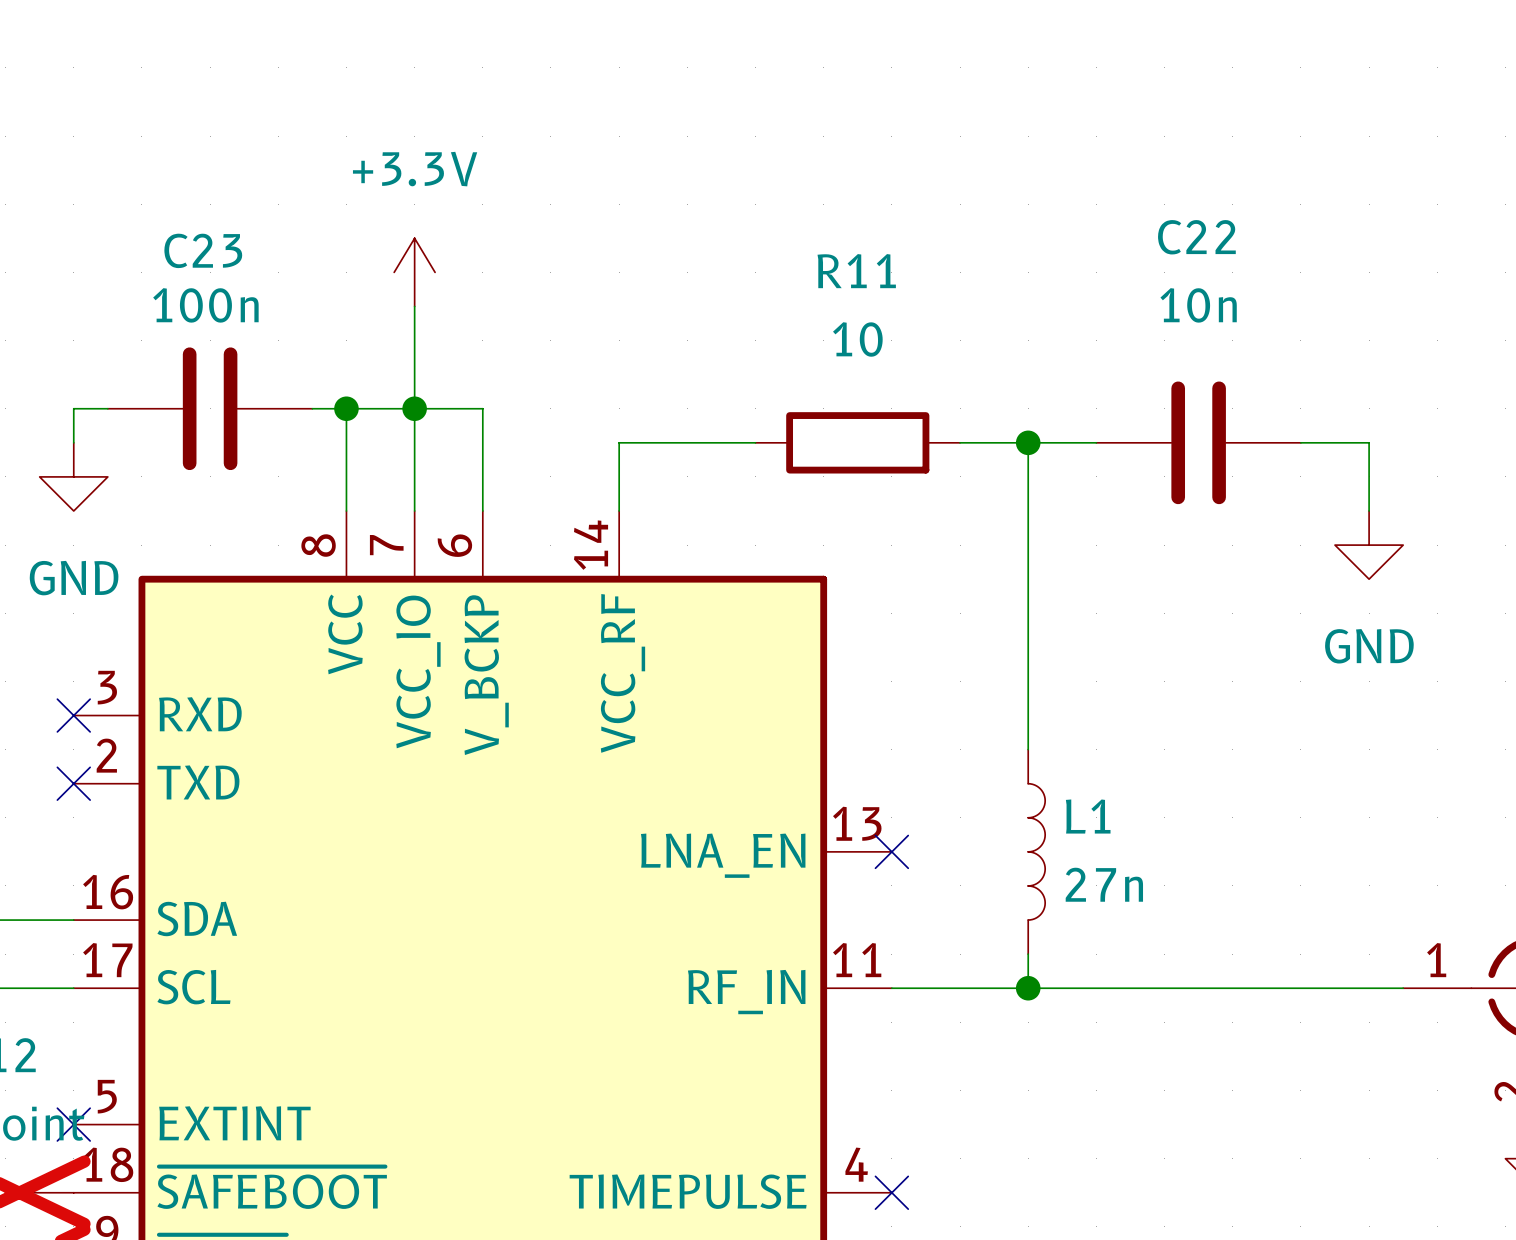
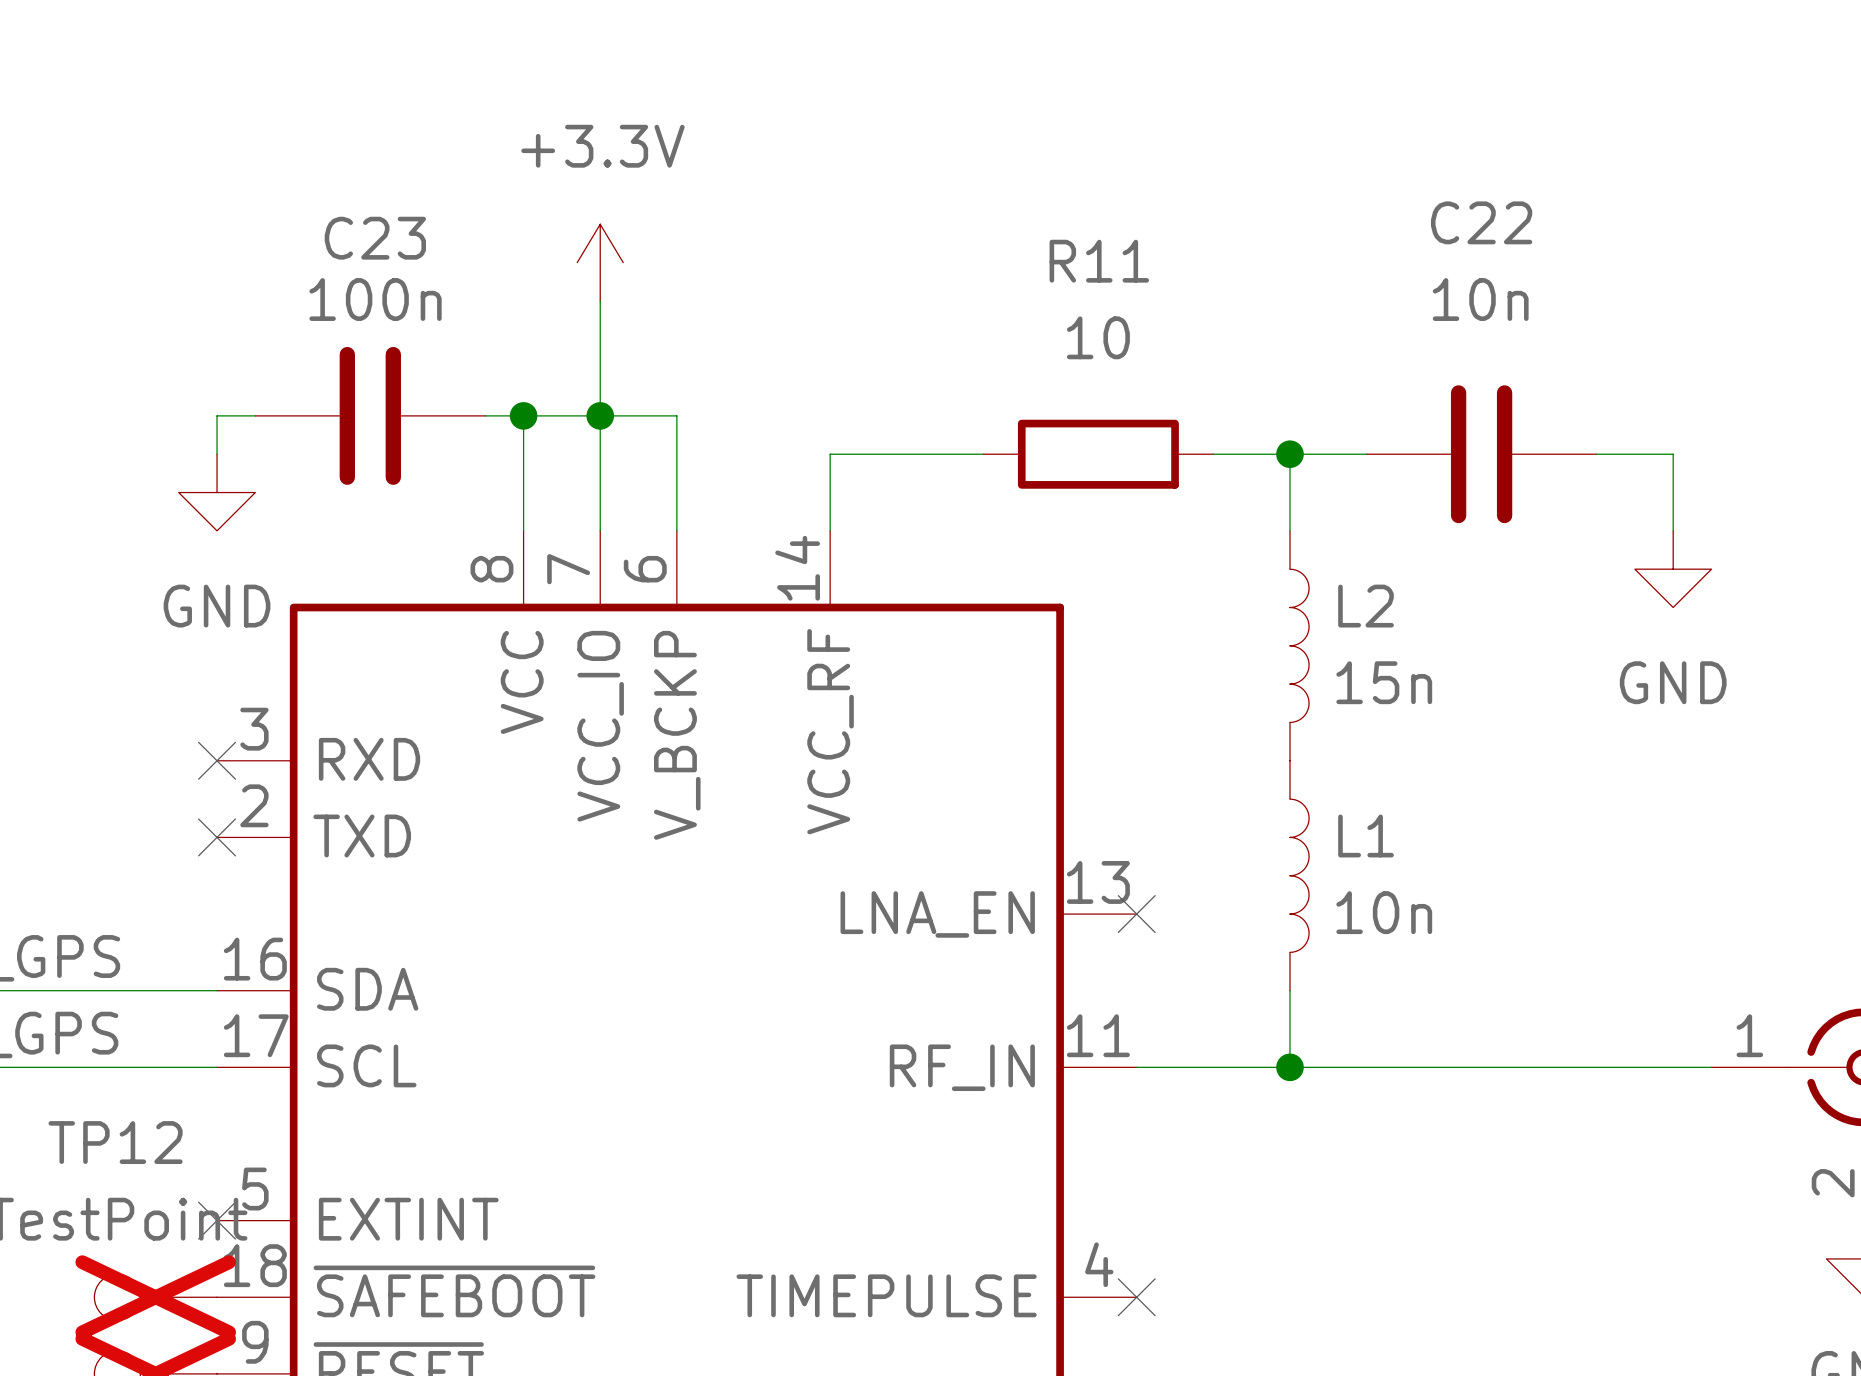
wire: (1028, 511) (1028, 749) -> none
L2: none -> 15n (1299, 645)
L1 position: (1036, 851) -> (1299, 875)
L1 value: 27n (1104, 884) -> 10n (1384, 912)

